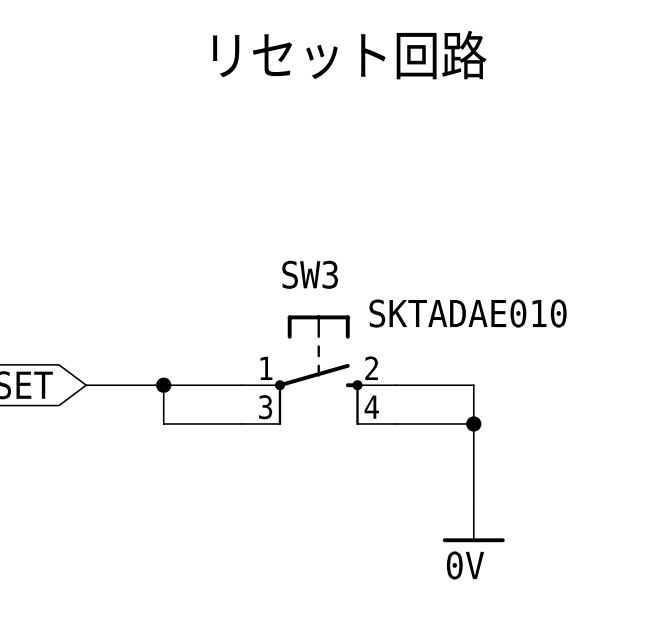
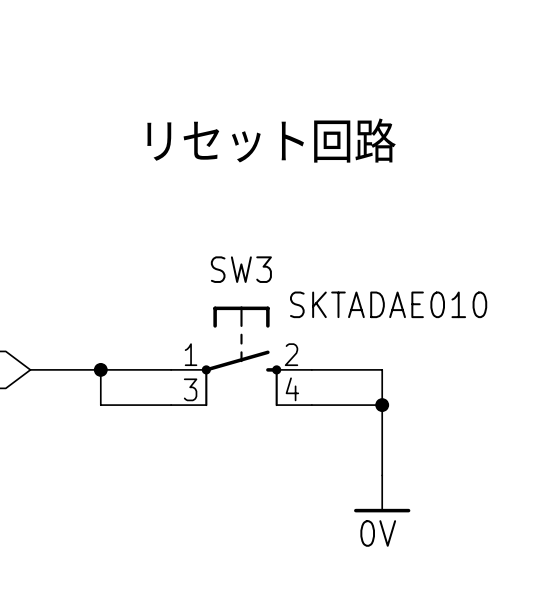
text position: リセット回路 (349, 55) -> リセット回路 (271, 140)

